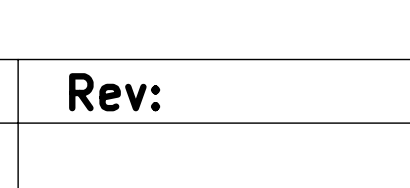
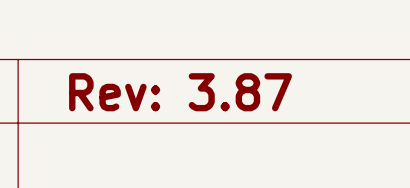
title block: Rev: (114, 92) -> Rev: 3.87 (180, 92)

